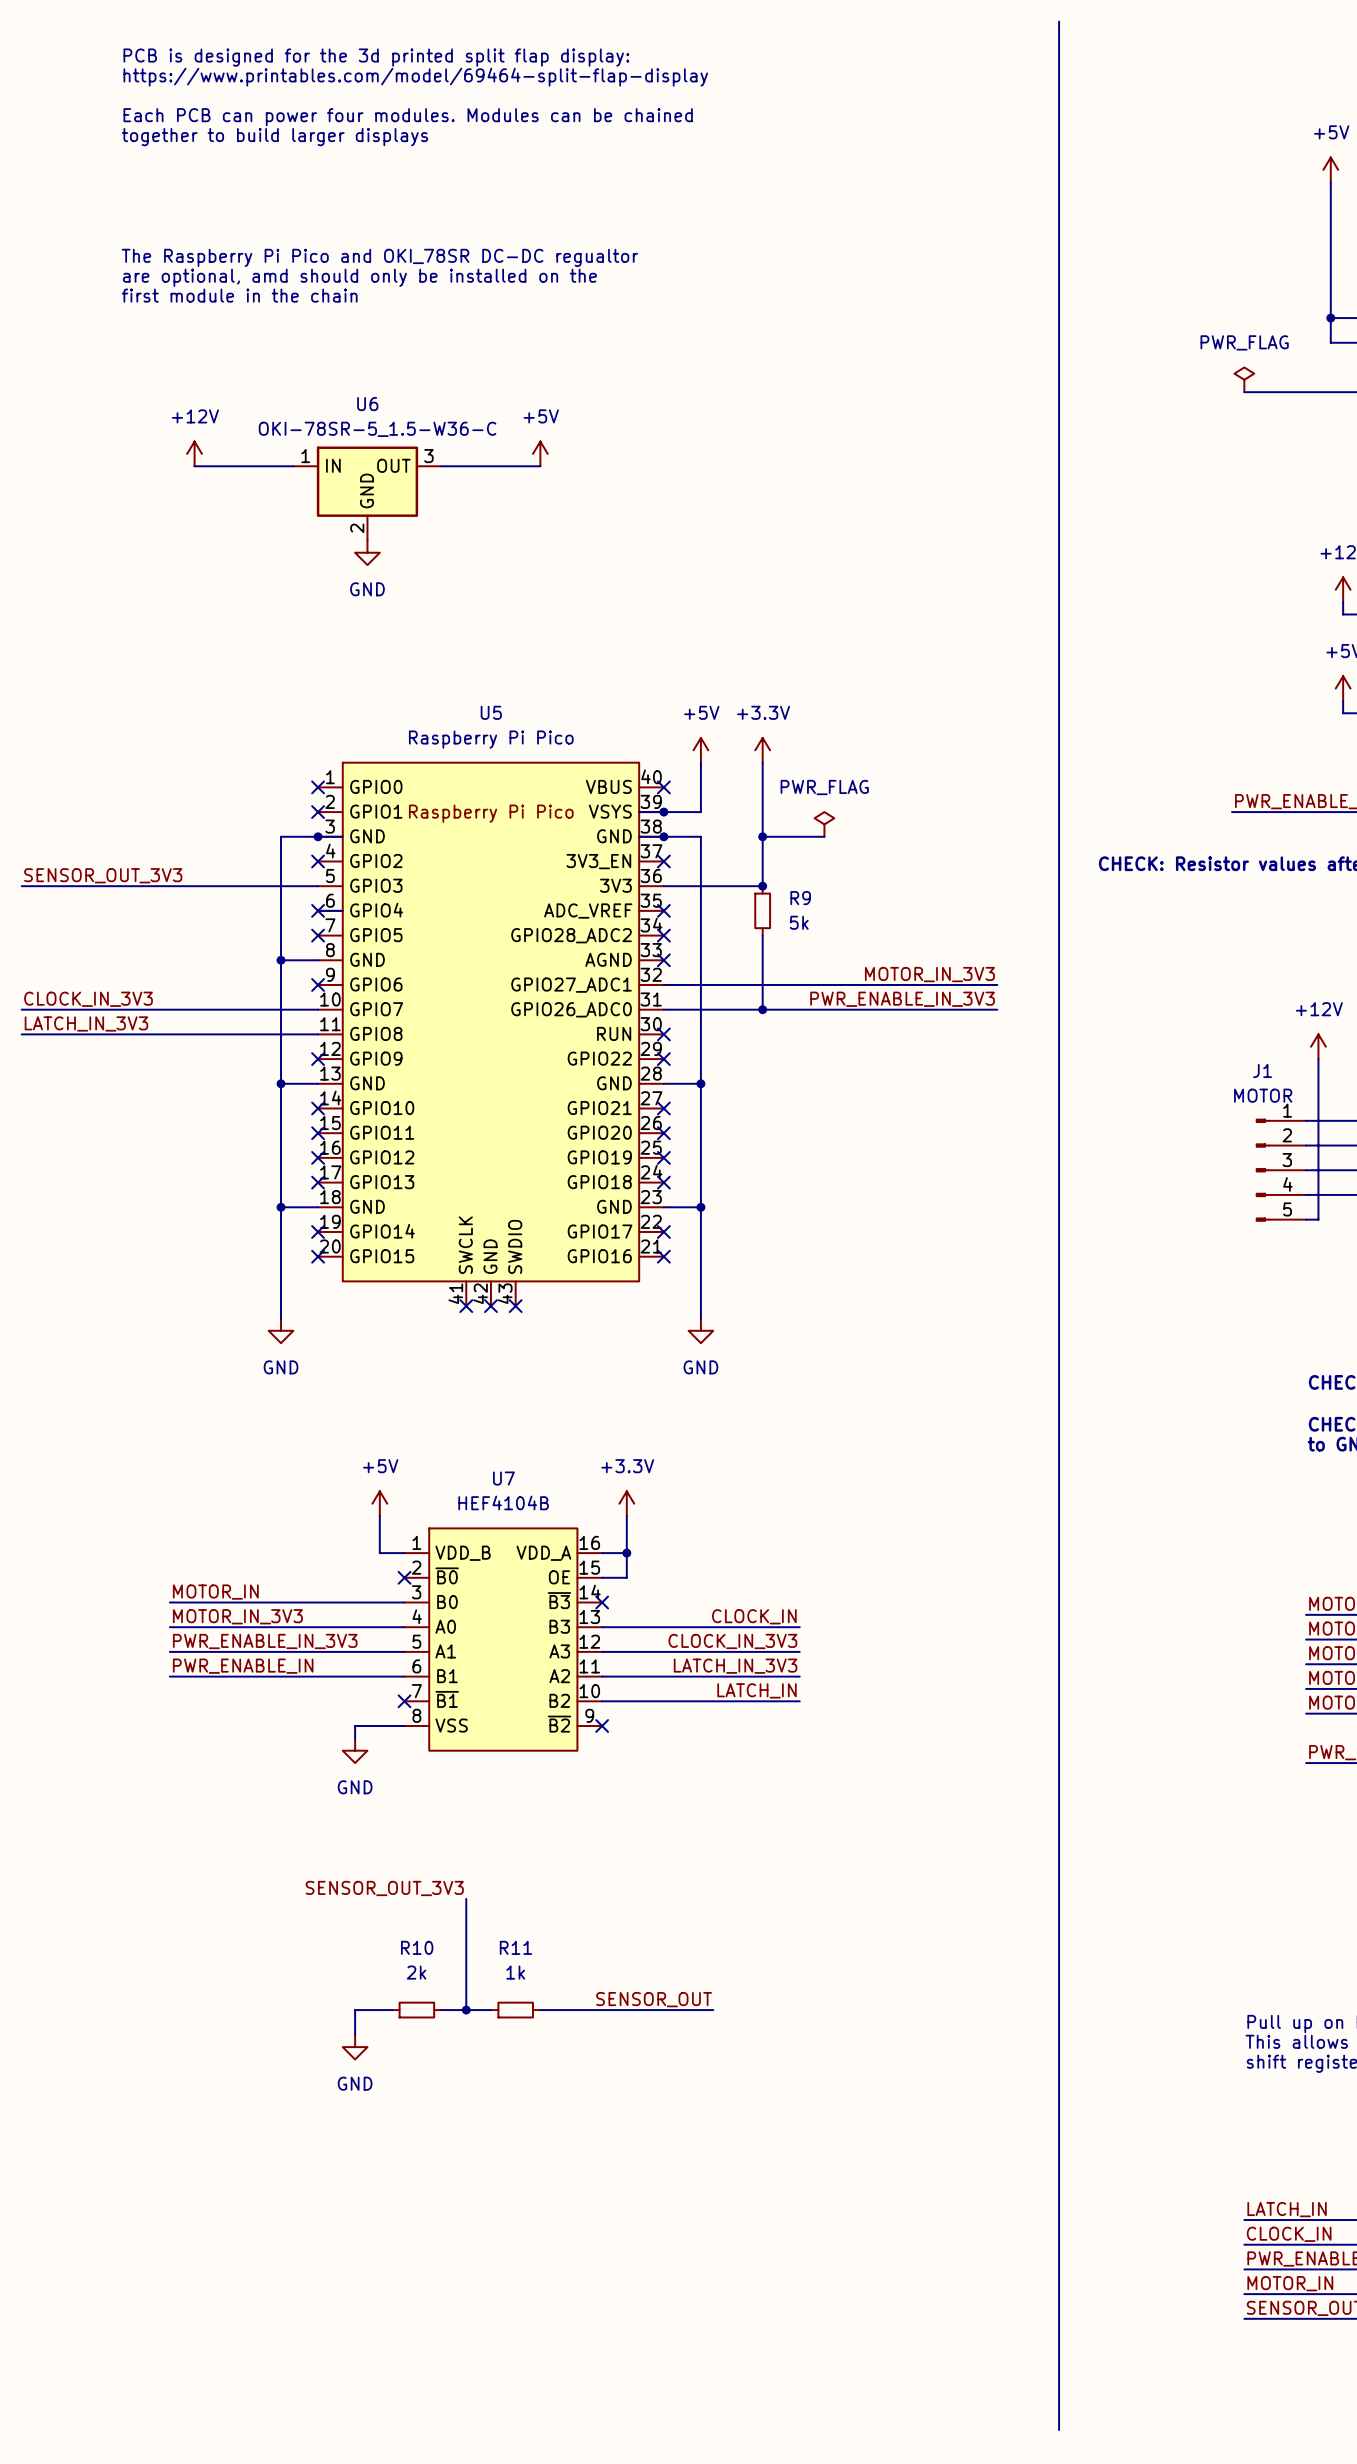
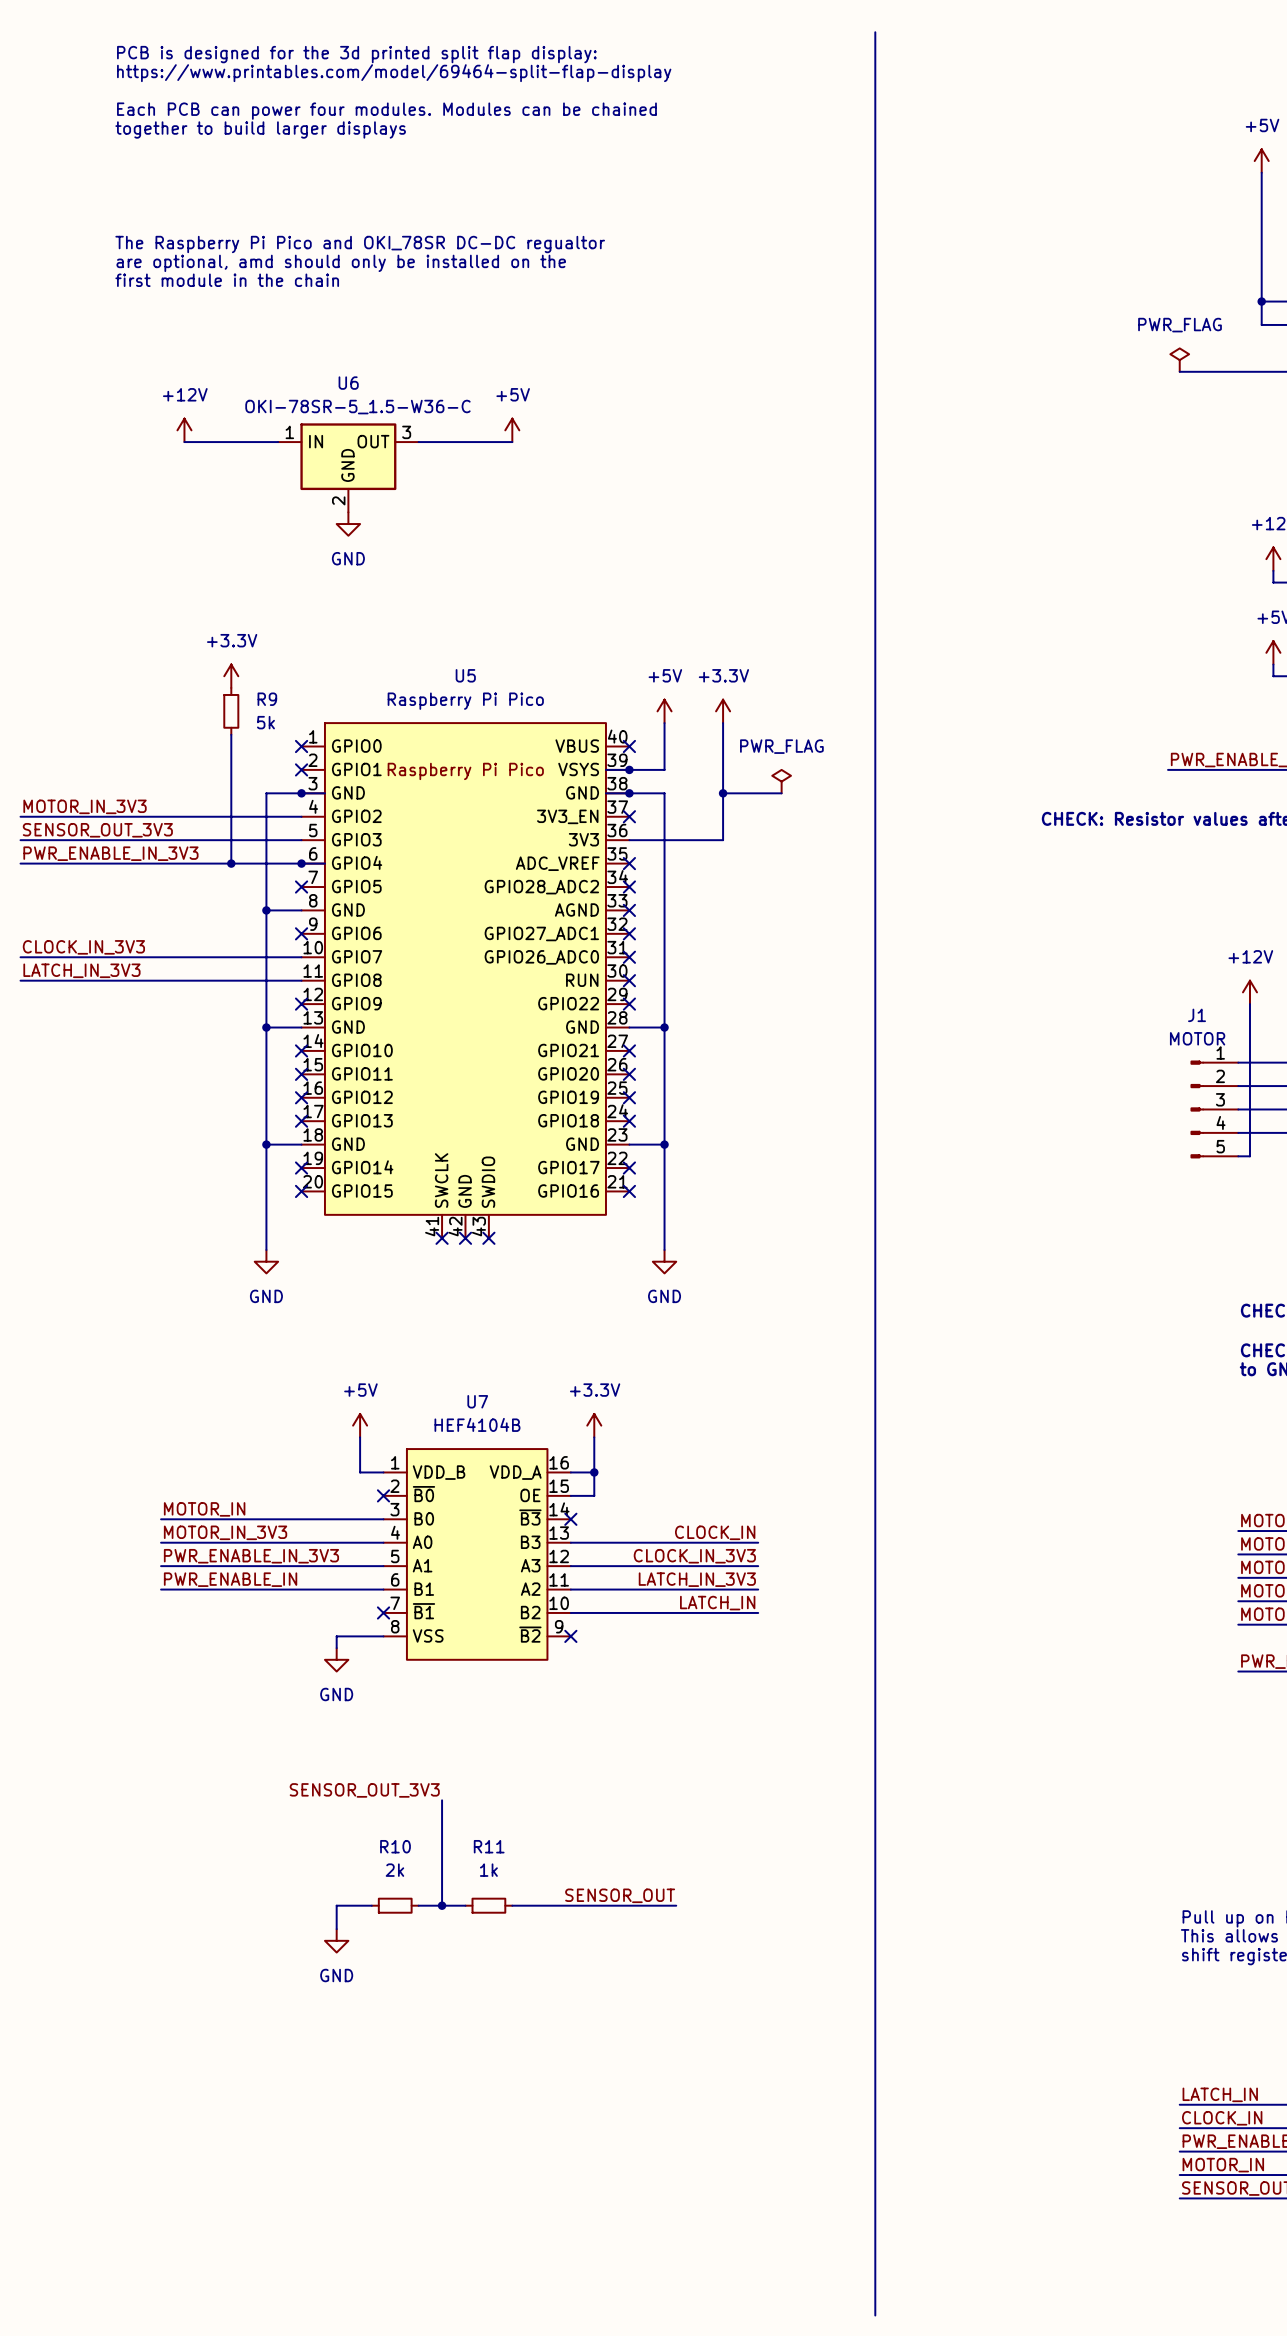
line: (1059, 21) (1059, 2429) -> (875, 32) (875, 2315)
power symbol: none -> +3.3V (231, 676)
wire: none -> (231, 734) (231, 863)
label: none -> MOTOR_IN_3V3 (85, 806)
wire: none -> (20, 816) (301, 816)
no-connect mark: (318, 861) -> none
junction: (762, 886) -> none
label: none -> PWR_ENABLE_IN_3V3 (110, 853)
wire: none -> (20, 863) (301, 863)
junction: none -> (231, 863)
junction: none -> (301, 863)
no-connect mark: (318, 910) -> none
R9 position: (762, 910) -> (231, 711)
wire: (762, 935) (762, 1009) -> none
label: MOTOR_IN_3V3 (929, 974) -> none
wire: (663, 984) (997, 984) -> none
no-connect mark: none -> (629, 933)
label: PWR_ENABLE_IN_3V3 (902, 999) -> none
wire: (663, 1009) (997, 1009) -> none
no-connect mark: none -> (629, 957)
junction: (762, 1009) -> none

